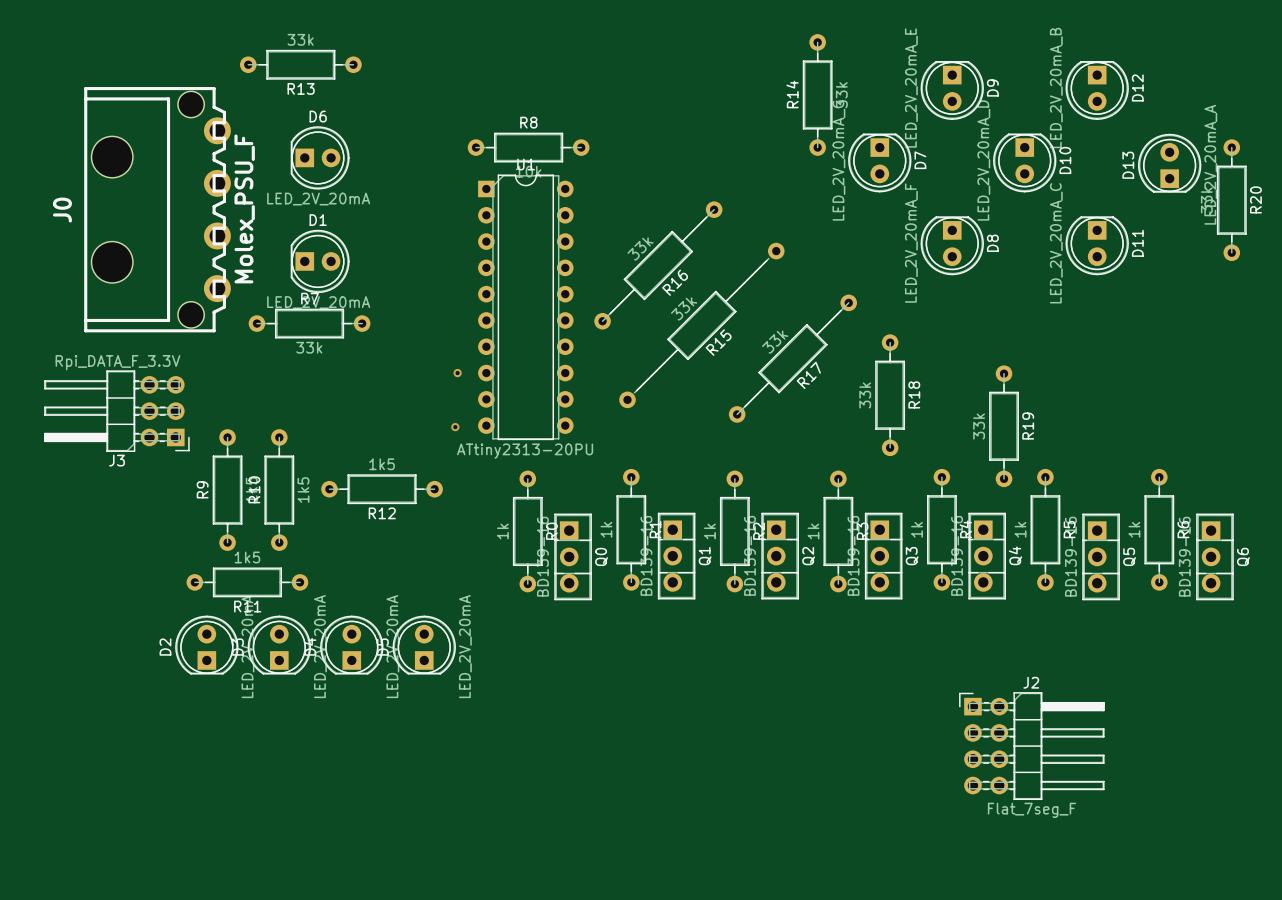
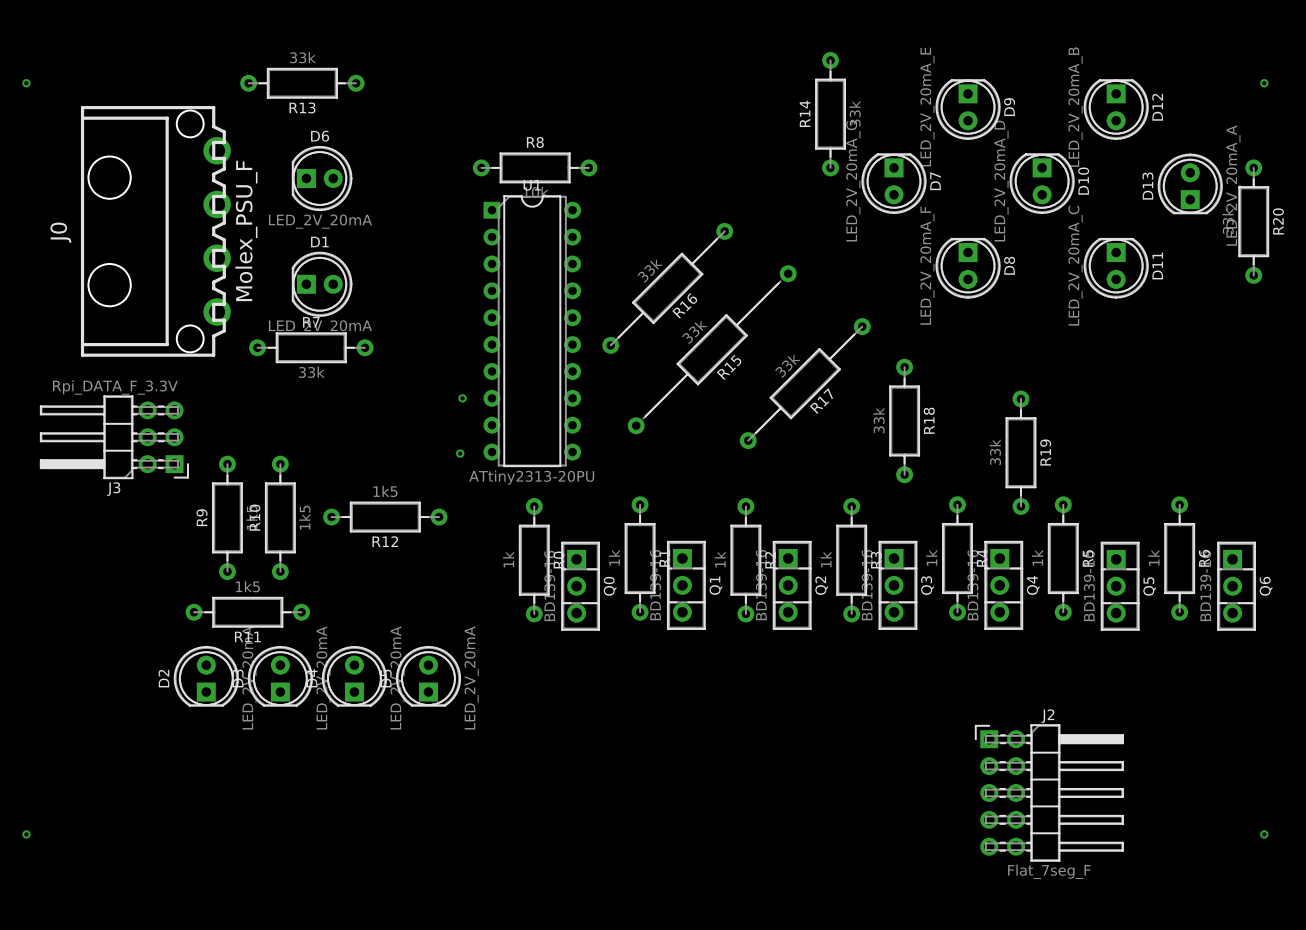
via: none -> (26, 83)
via: none -> (1264, 83)
J2 footprint: [959, 692, 1105, 800] -> [975, 724, 1124, 862]
via: none -> (26, 834)
via: none -> (1264, 834)

